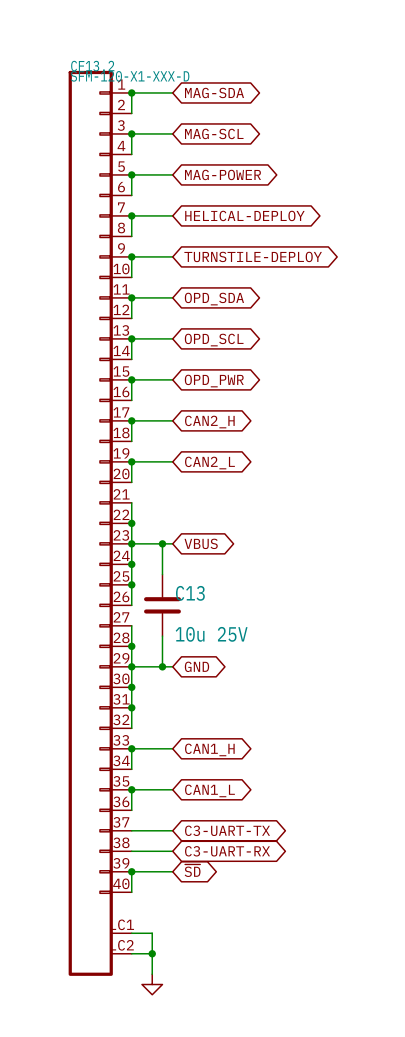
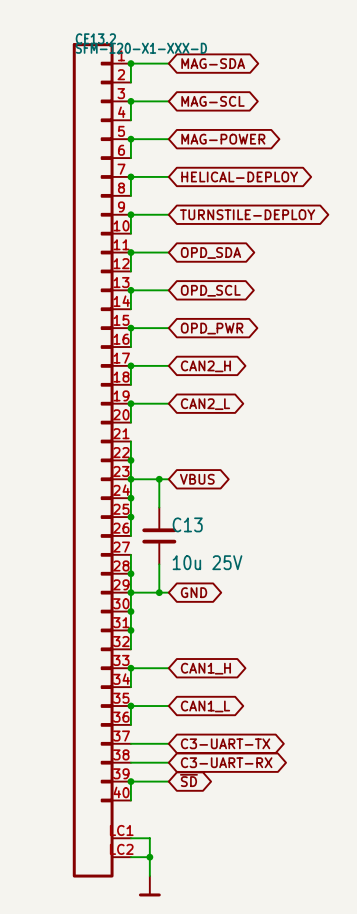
power symbol shape: [141, 974, 163, 995] -> [138, 876, 161, 897]

